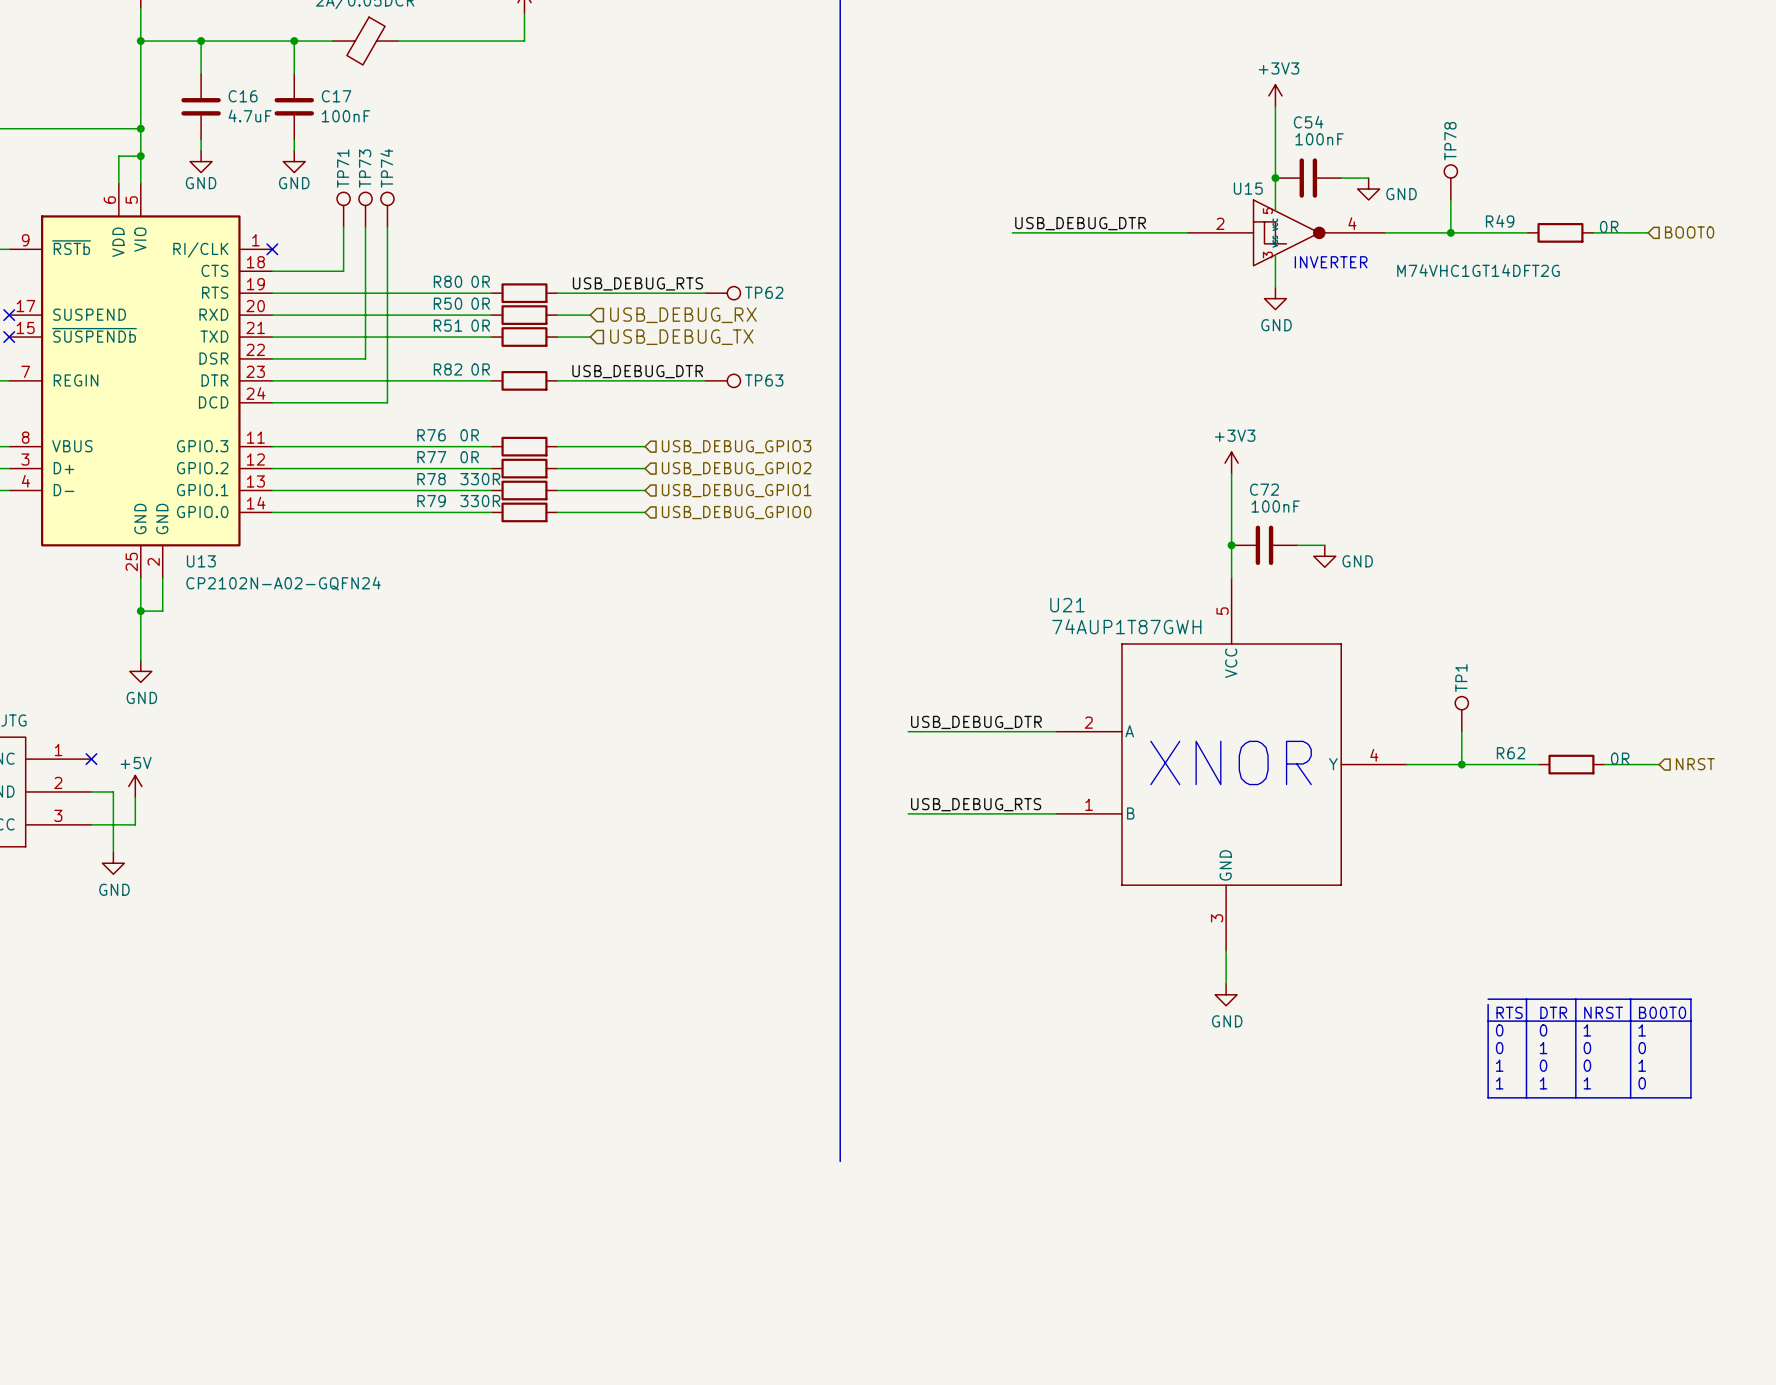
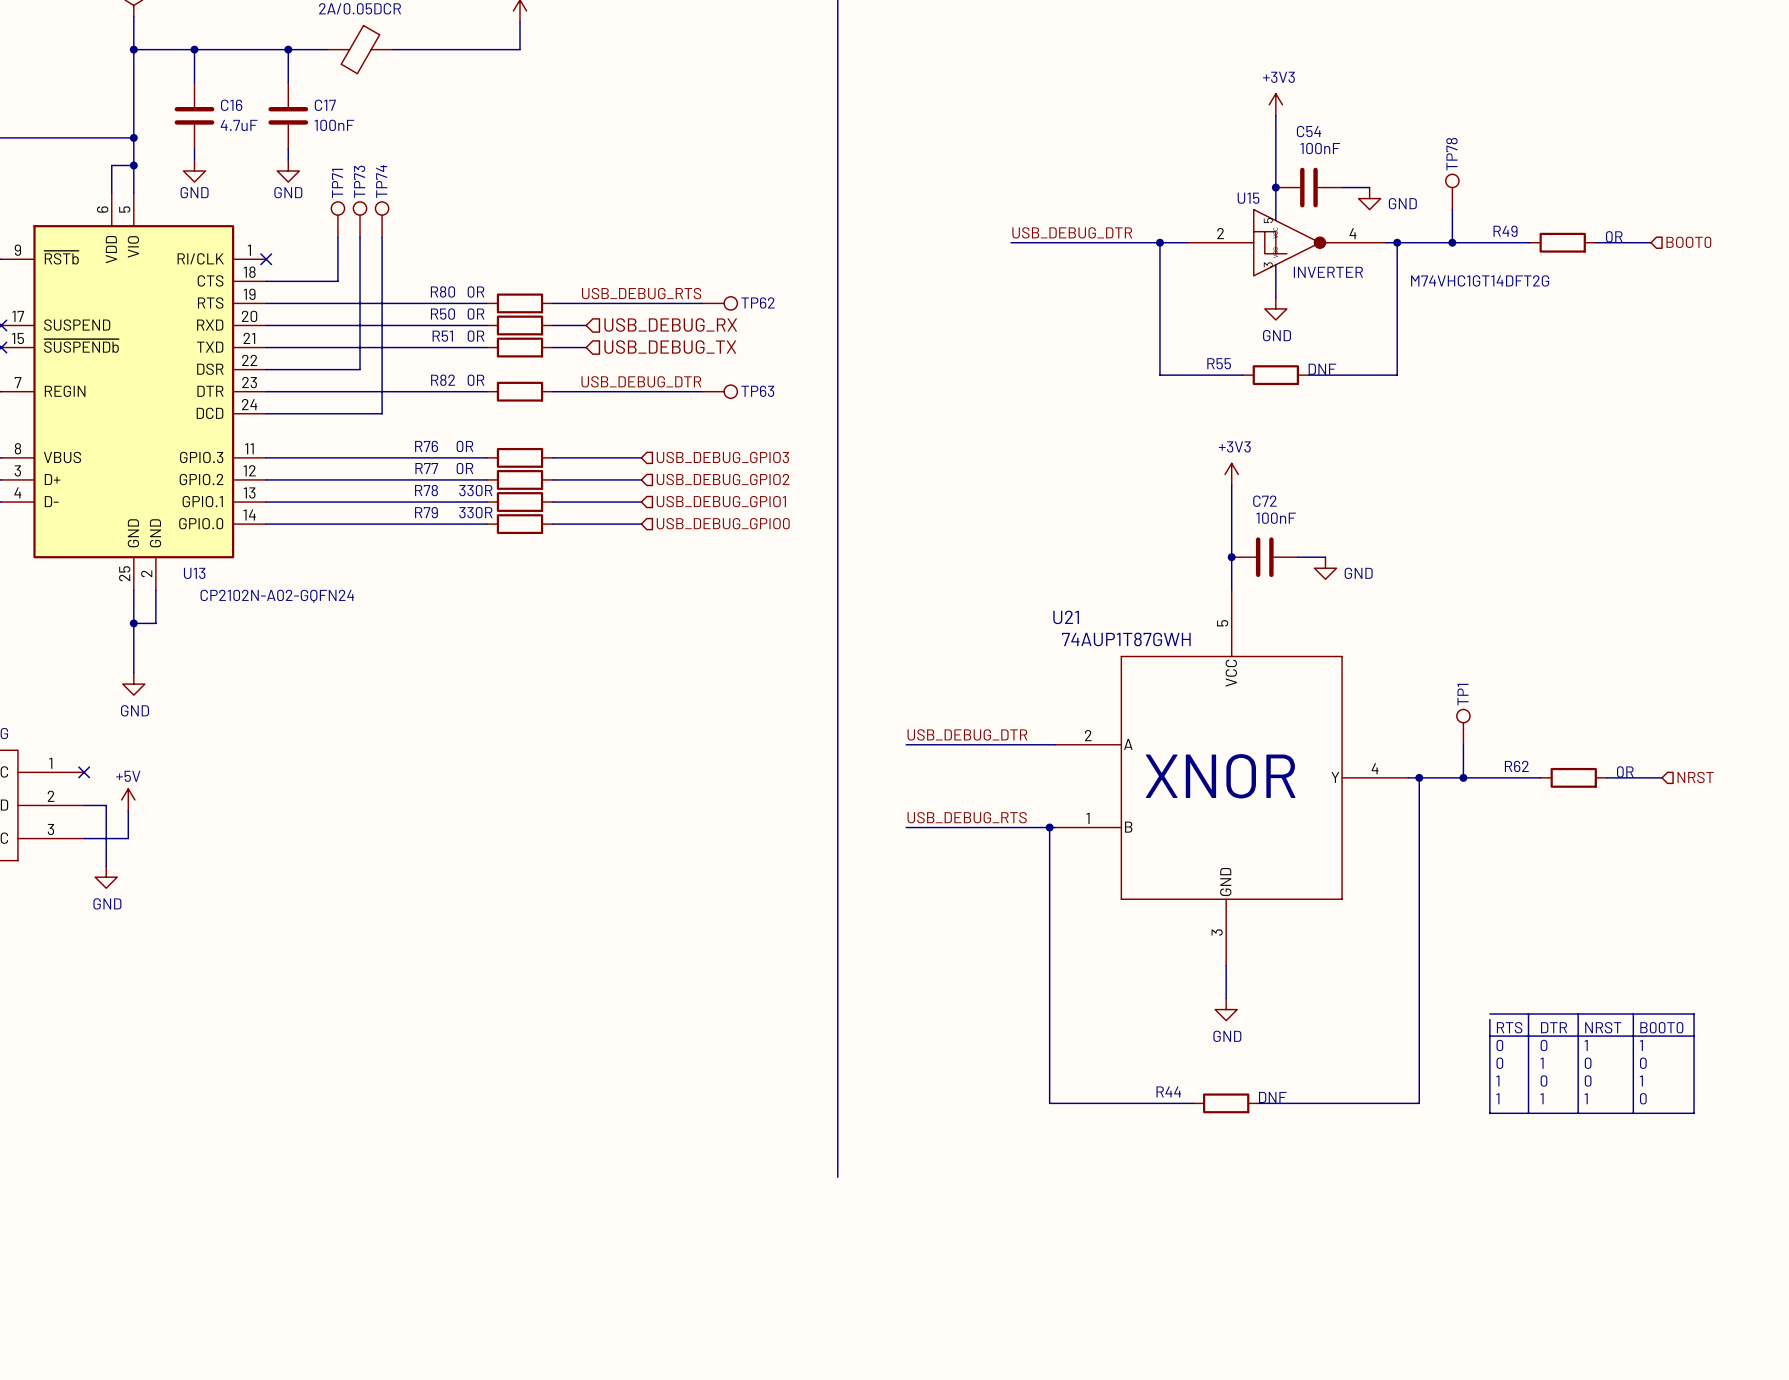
wire: none -> (1159, 242) (1159, 375) (1242, 375)
junction: none -> (1159, 242)
wire: none -> (1397, 242) (1397, 375) (1308, 375)
junction: none -> (1397, 242)
R55: none -> DNF (1275, 375)
wire: none -> (1419, 777) (1419, 1103) (1259, 1103)
junction: none -> (1419, 777)
wire: none -> (1049, 827) (1049, 1103) (1193, 1103)
junction: none -> (1049, 827)
R44: none -> DNF (1226, 1103)

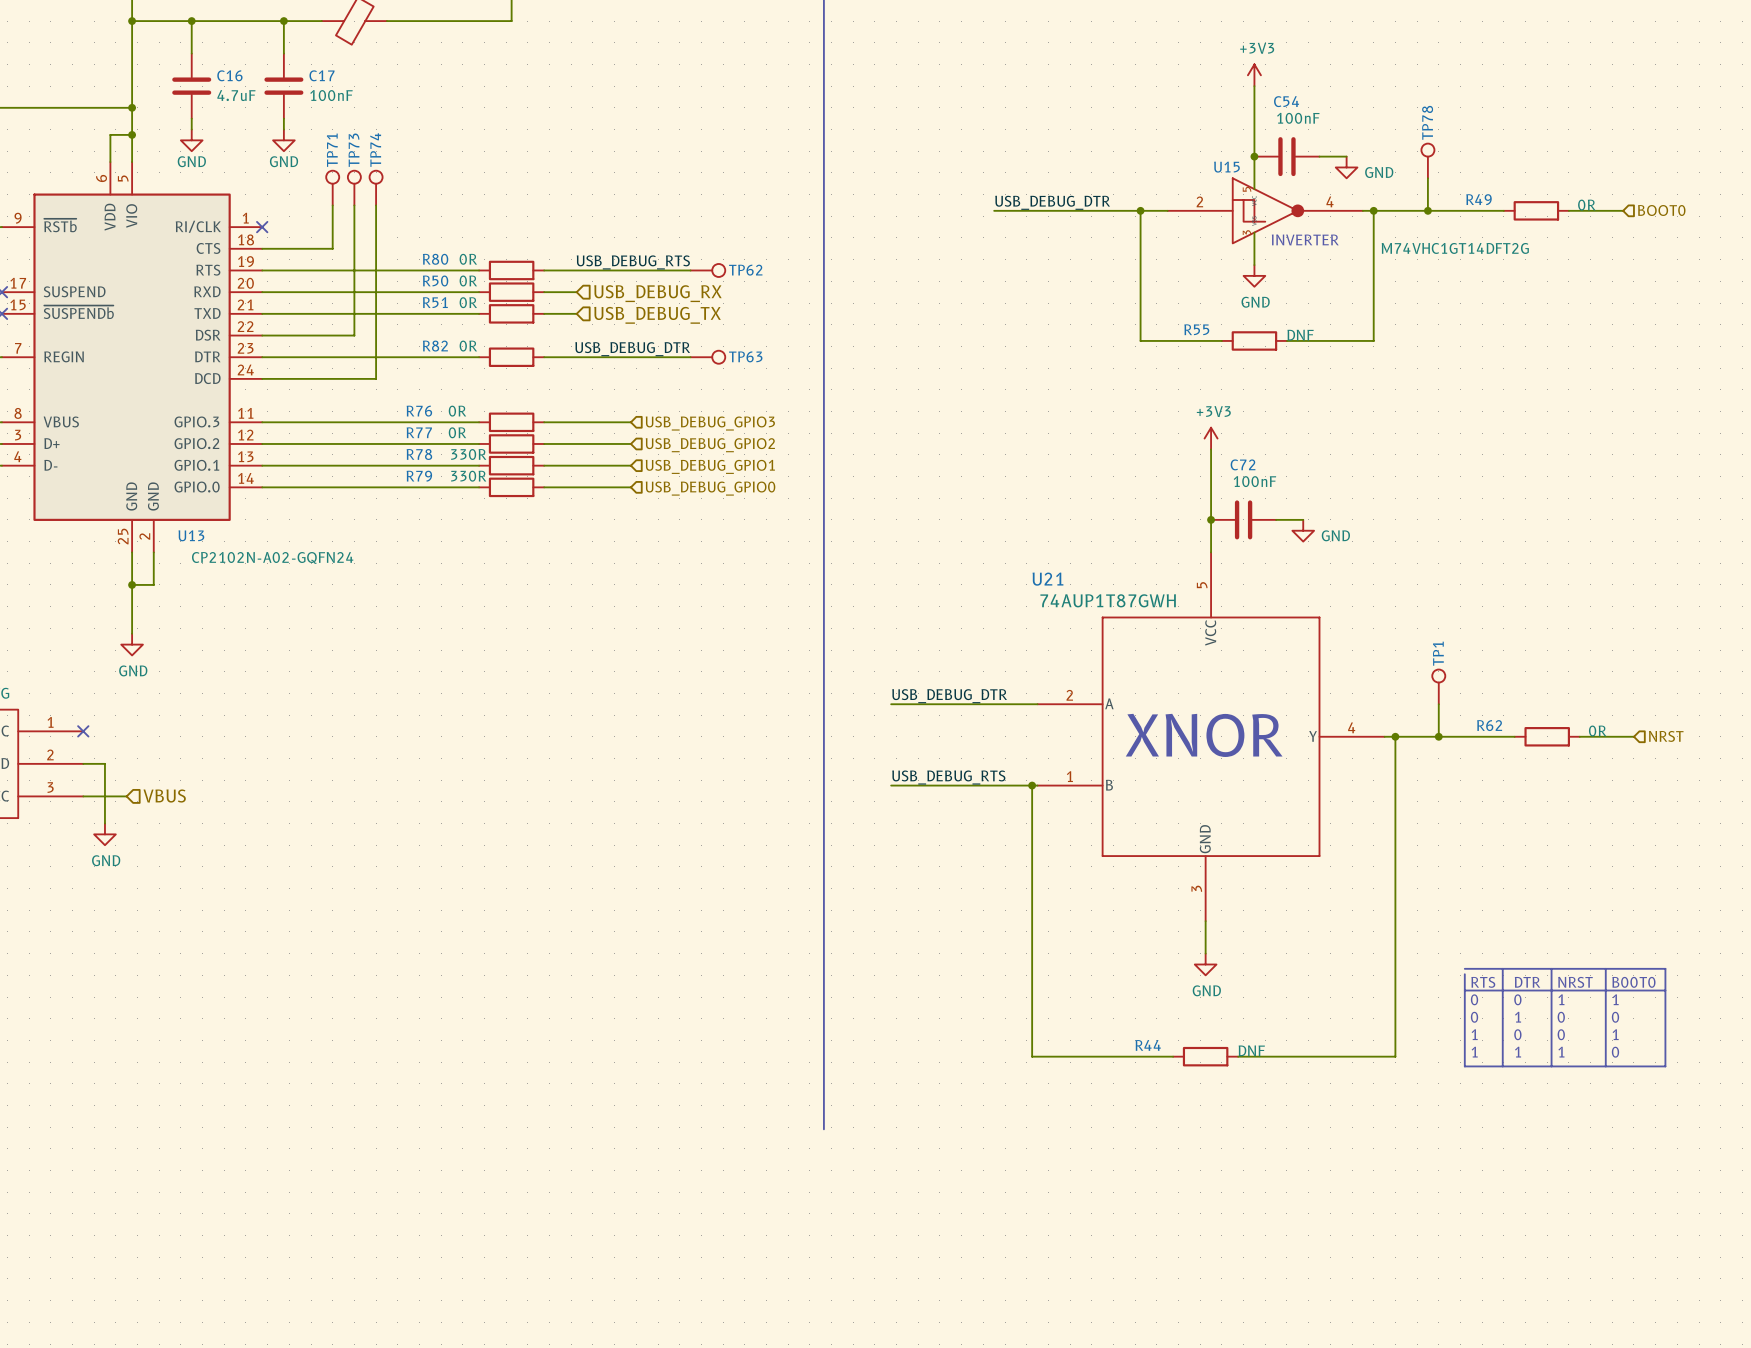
power symbol: +5V (128, 799) -> none
wire: (128, 810) (128, 838) -> none
hierarchical label: none -> VBUS (164, 796)

